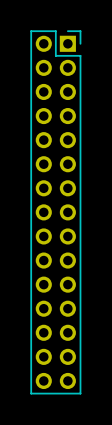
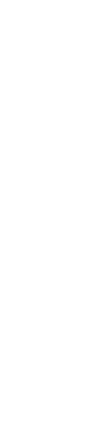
part: (55, 212) -> none

